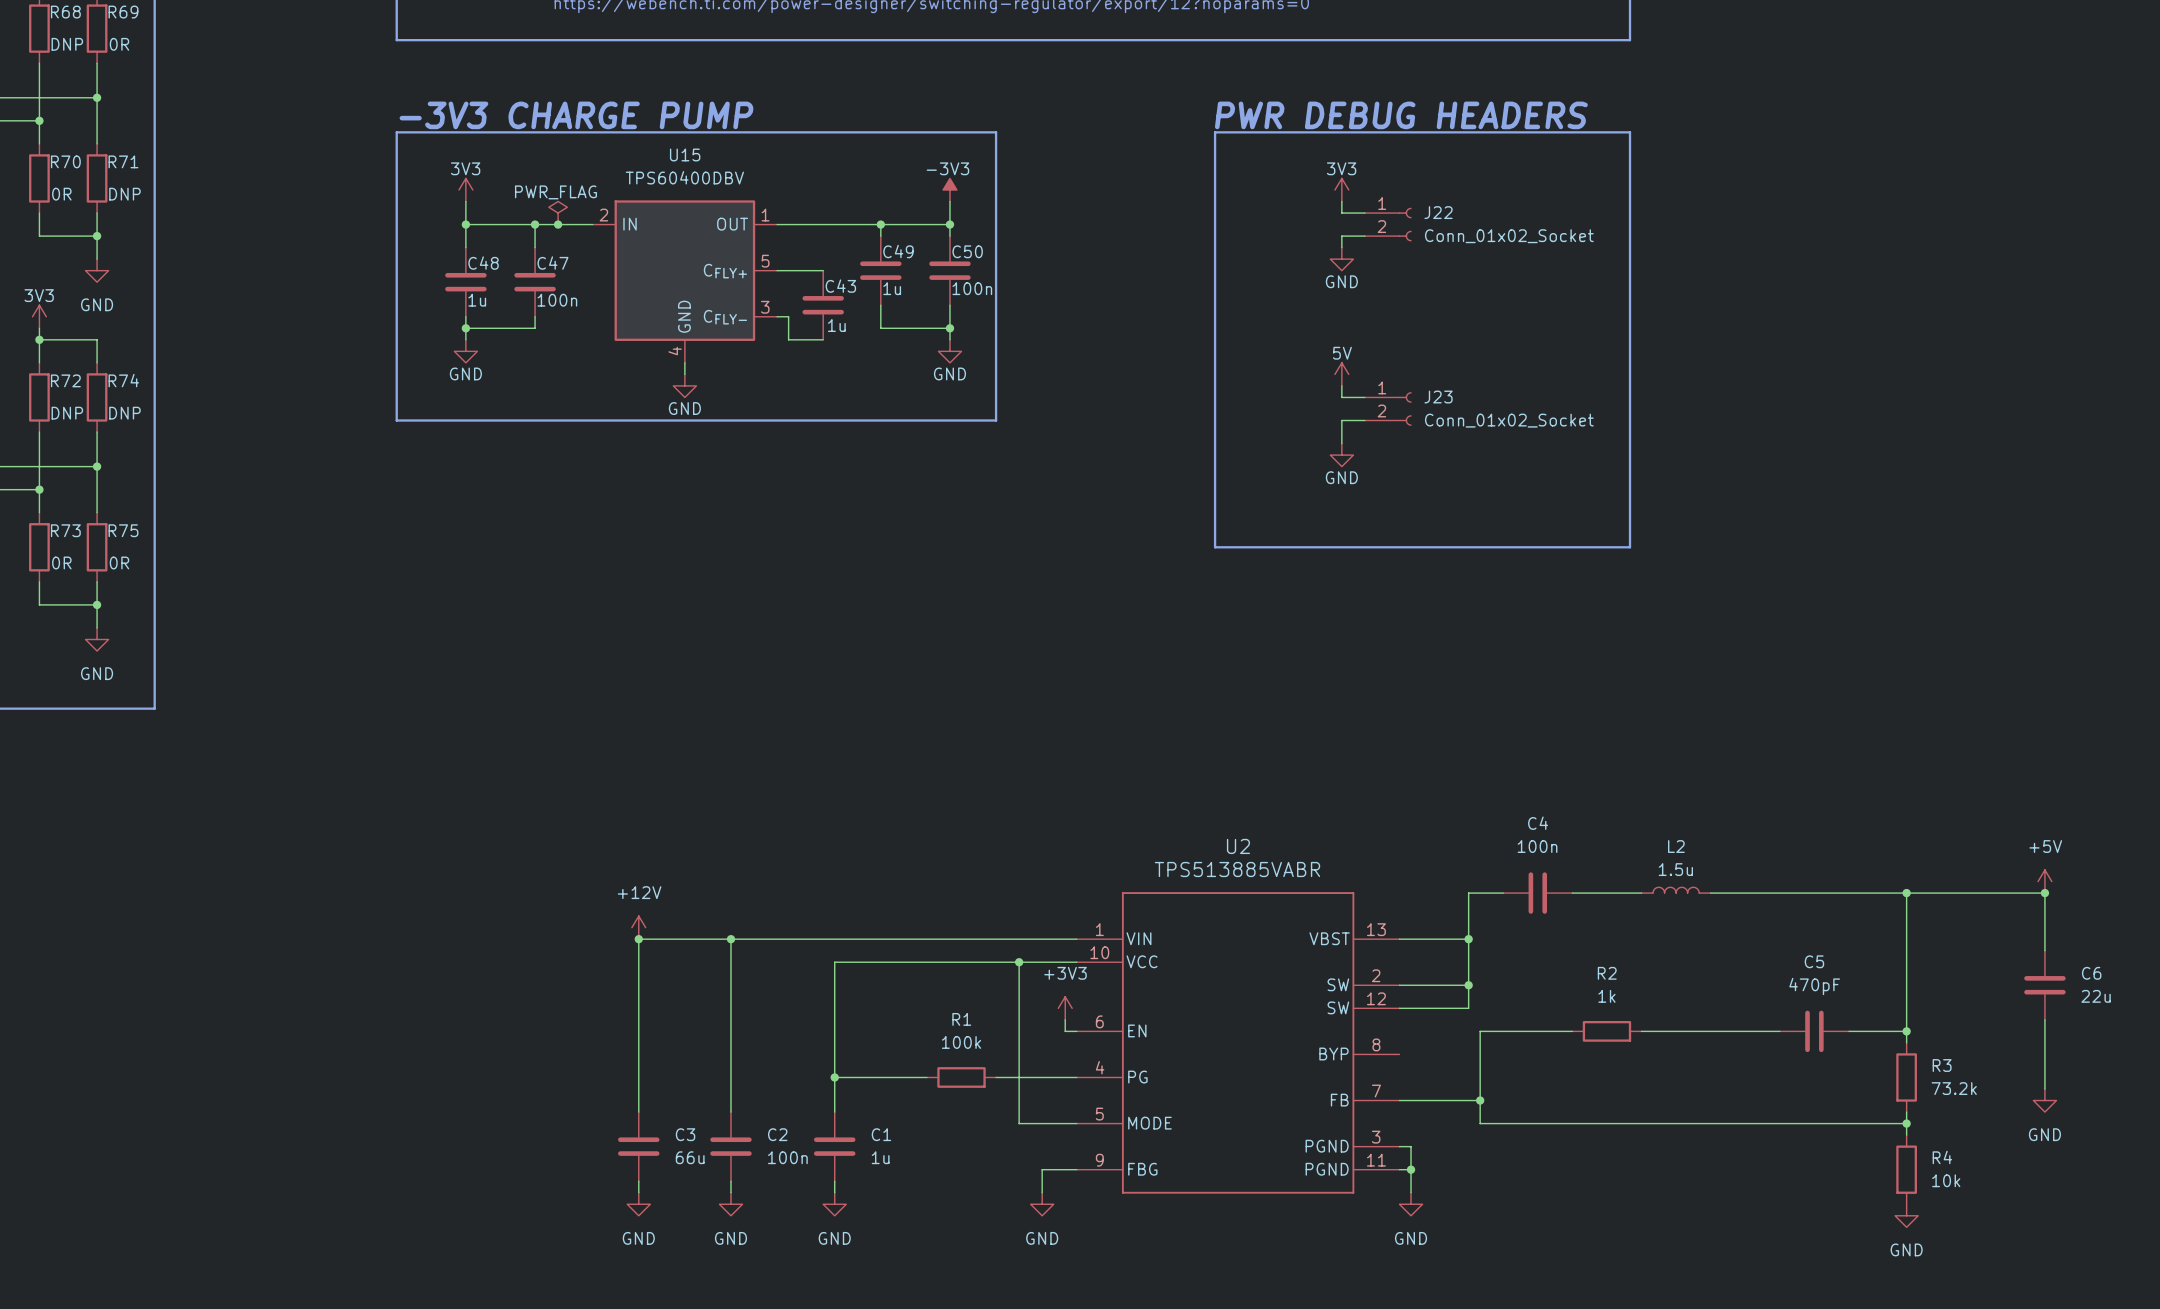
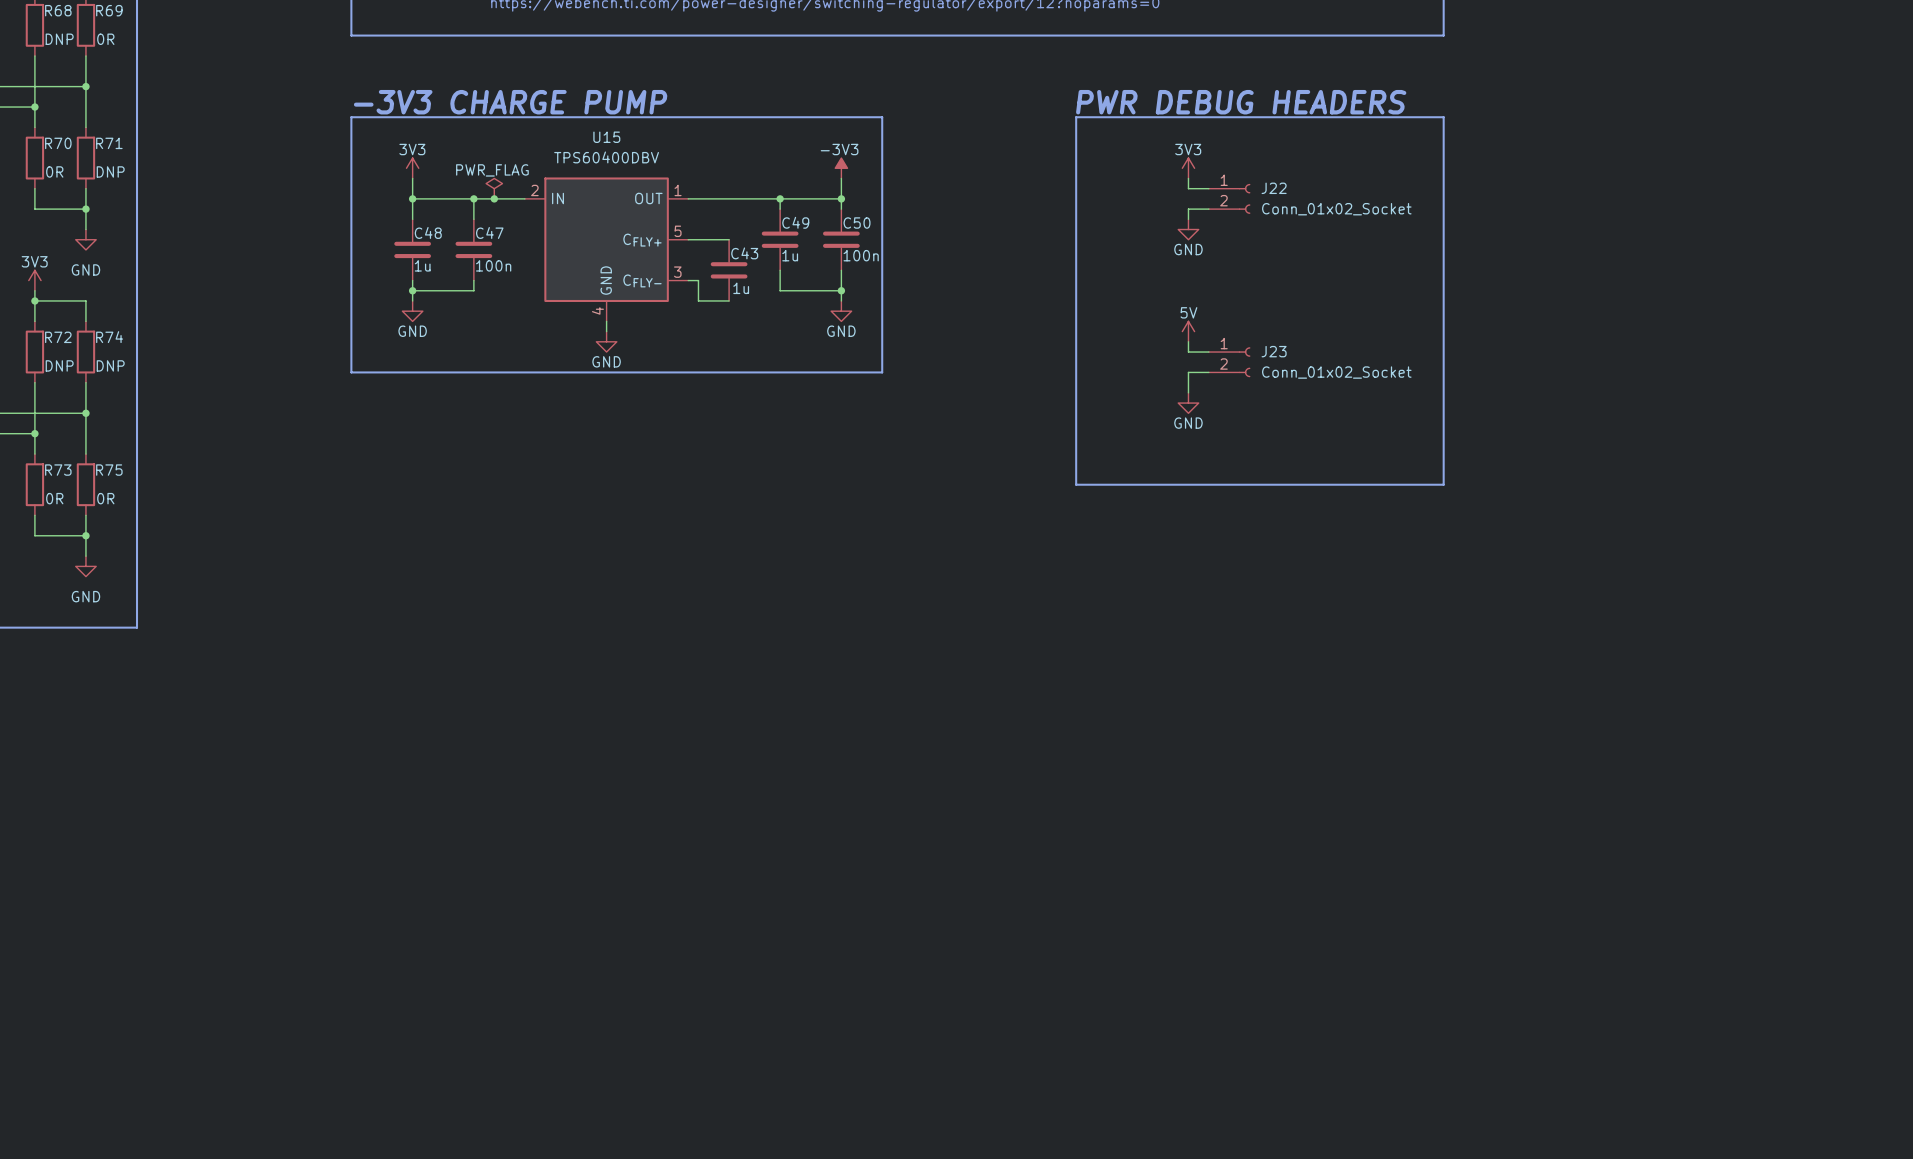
power symbol: +5V (2044, 881) -> none
L2: 1.5u (1676, 890) -> none
wire: (1503, 893) (1468, 893) (1468, 1008) (1399, 1008) -> none
C4: 100n (1537, 893) -> none
wire: (1572, 893) (1641, 893) -> none
wire: (1710, 893) (2044, 893) (2044, 950) -> none
wire: (1906, 893) (1906, 1042) -> none
junction: (1906, 893) -> none
junction: (2044, 893) -> none
power symbol: +12V (638, 927) -> none
junction: (638, 939) -> none
wire: (730, 939) (730, 1112) -> none
junction: (730, 939) -> none
wire: (1076, 939) (638, 939) (638, 1112) -> none
wire: (1399, 939) (1468, 939) -> none
junction: (1468, 939) -> none
wire: (1019, 962) (1019, 1123) (1076, 1123) -> none
junction: (1019, 962) -> none
wire: (1076, 962) (834, 962) (834, 1112) -> none
wire: (1399, 985) (1468, 985) -> none
junction: (1468, 985) -> none
C6: 22u (2044, 985) -> none
power symbol: +3V3 (1065, 1008) -> none
wire: (1065, 1019) (1065, 1031) (1076, 1031) -> none
wire: (2044, 1019) (2044, 1089) -> none
wire: (1572, 1031) (1480, 1031) (1480, 1123) (1906, 1123) -> none
R2: 1k (1606, 1031) -> none
wire: (1641, 1031) (1779, 1031) -> none
C5: 470pF (1814, 1031) -> none
wire: (1849, 1031) (1906, 1031) -> none
junction: (1906, 1031) -> none
U2: TPS513885VABR (1238, 1042) -> none
wire: (834, 1077) (926, 1077) -> none
junction: (834, 1077) -> none
R1: 100k (961, 1077) -> none
wire: (996, 1077) (1076, 1077) -> none
R3: 73.2k (1906, 1077) -> none
wire: (1399, 1100) (1480, 1100) -> none
junction: (1480, 1100) -> none
power symbol: GND (2044, 1100) -> none
wire: (1906, 1112) (1906, 1135) -> none
junction: (1906, 1123) -> none
C3: 66u (638, 1146) -> none
C2: 100n (730, 1146) -> none
C1: 1u (834, 1146) -> none
wire: (1399, 1146) (1411, 1146) (1411, 1192) -> none
wire: (1076, 1169) (1042, 1169) (1042, 1192) -> none
wire: (1399, 1169) (1411, 1169) -> none
junction: (1411, 1169) -> none
R4: 10k (1906, 1169) -> none
wire: (638, 1181) (638, 1192) -> none
wire: (730, 1181) (730, 1192) -> none
wire: (834, 1181) (834, 1192) -> none
power symbol: GND (638, 1204) -> none
power symbol: GND (730, 1204) -> none
power symbol: GND (834, 1204) -> none
power symbol: GND (1042, 1204) -> none
power symbol: GND (1411, 1204) -> none
power symbol: GND (1906, 1215) -> none

